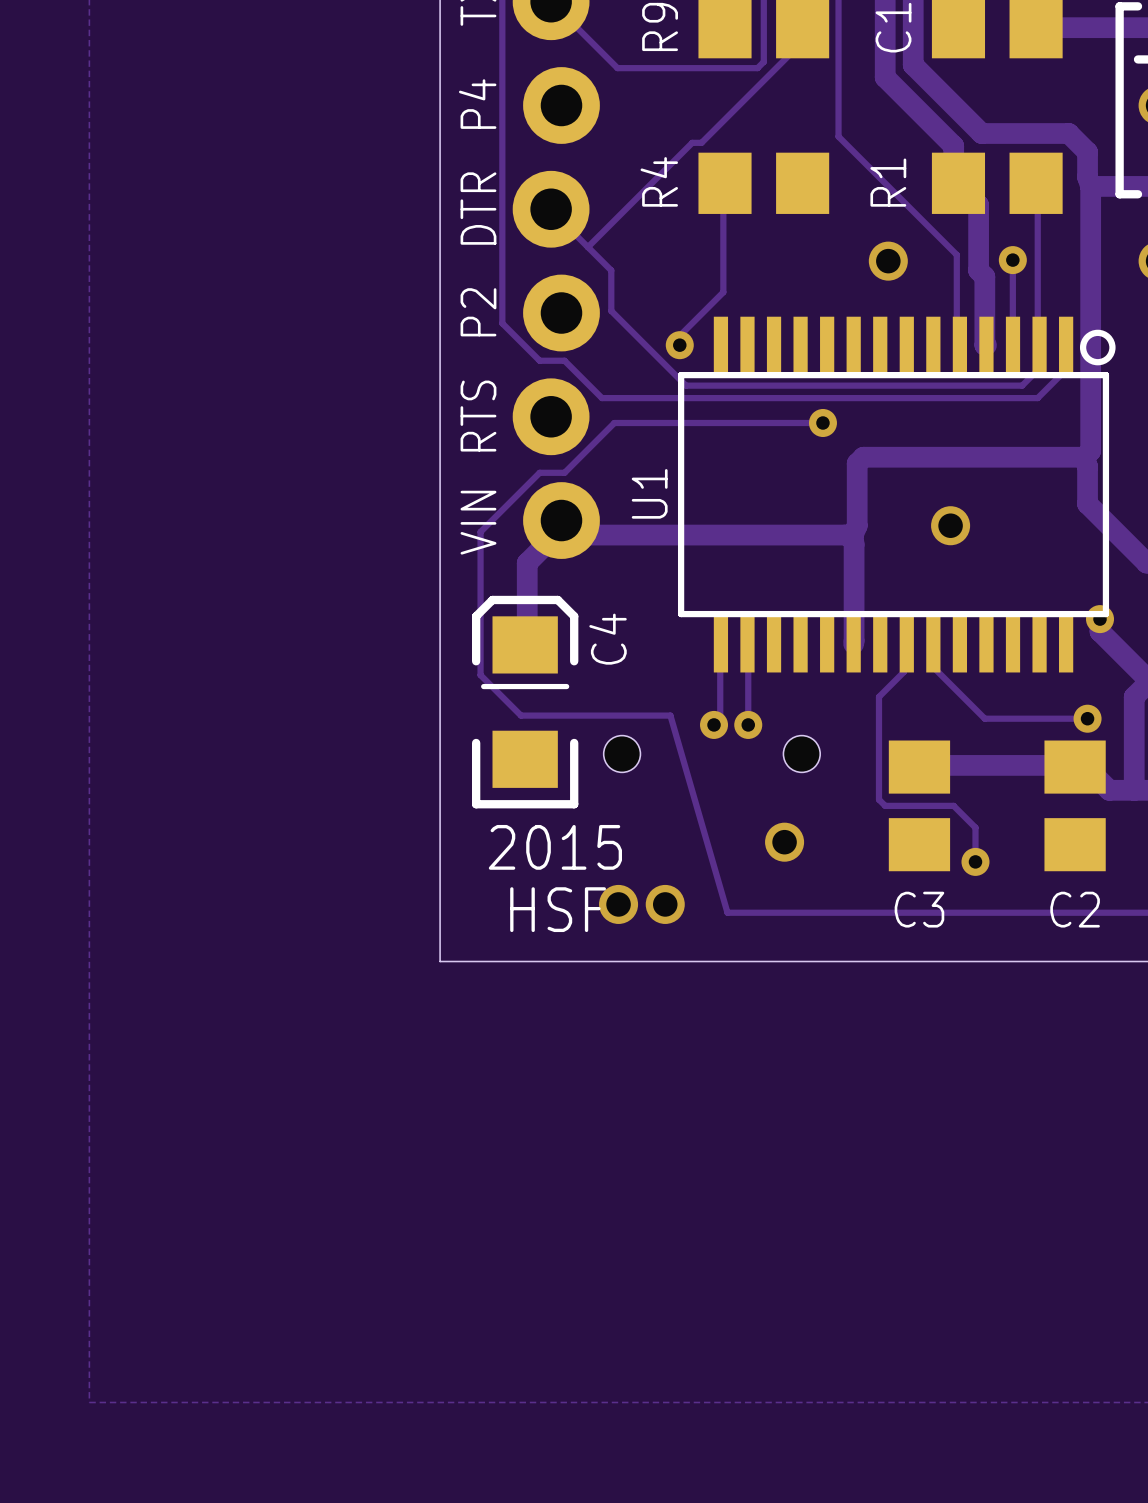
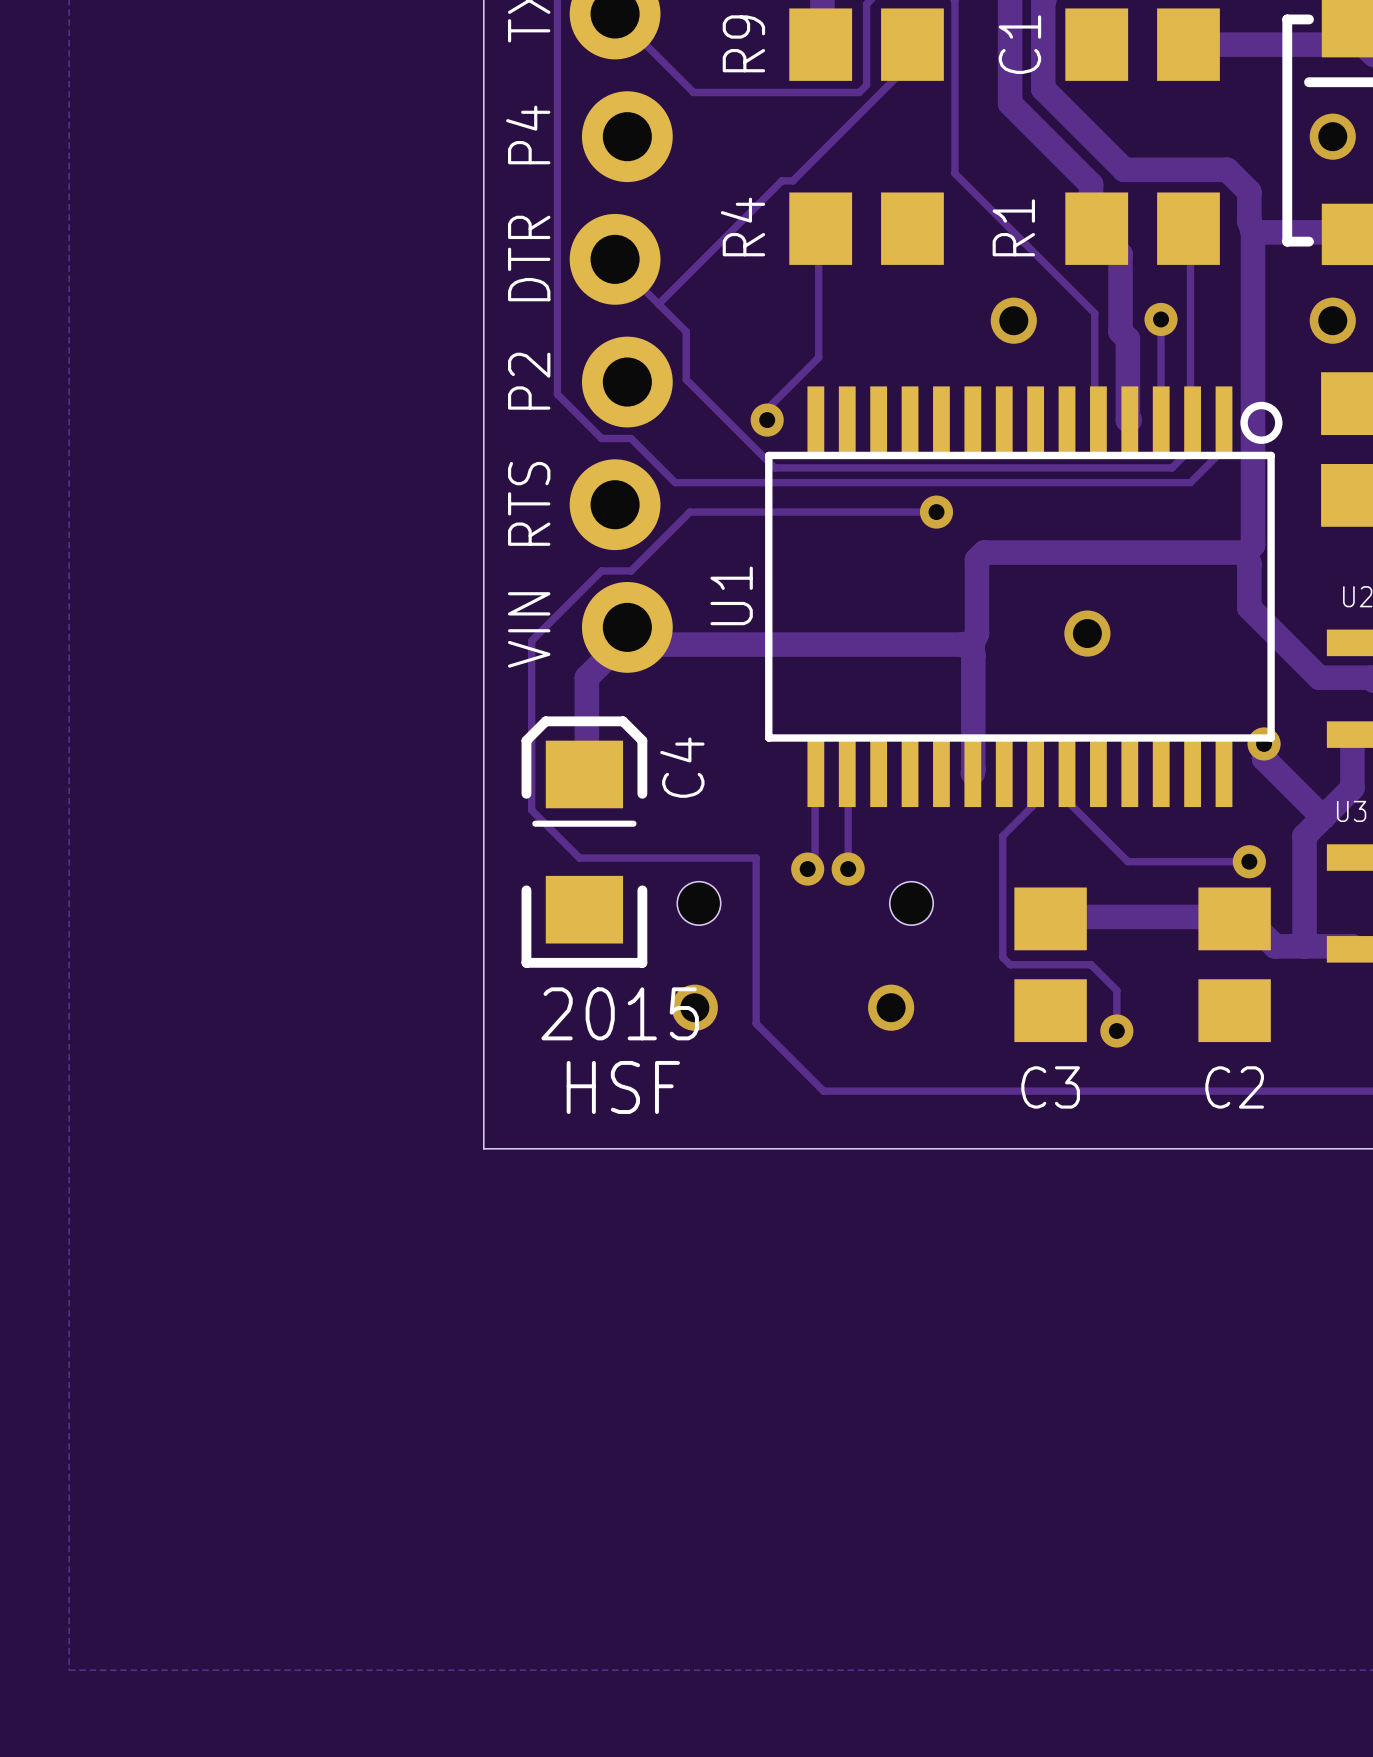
track: (670, 715) (727, 912) -> (756, 858) (756, 1023) (823, 1091)
via: none -> (694, 1007)
via: (618, 904) -> none
via: (665, 904) -> none

